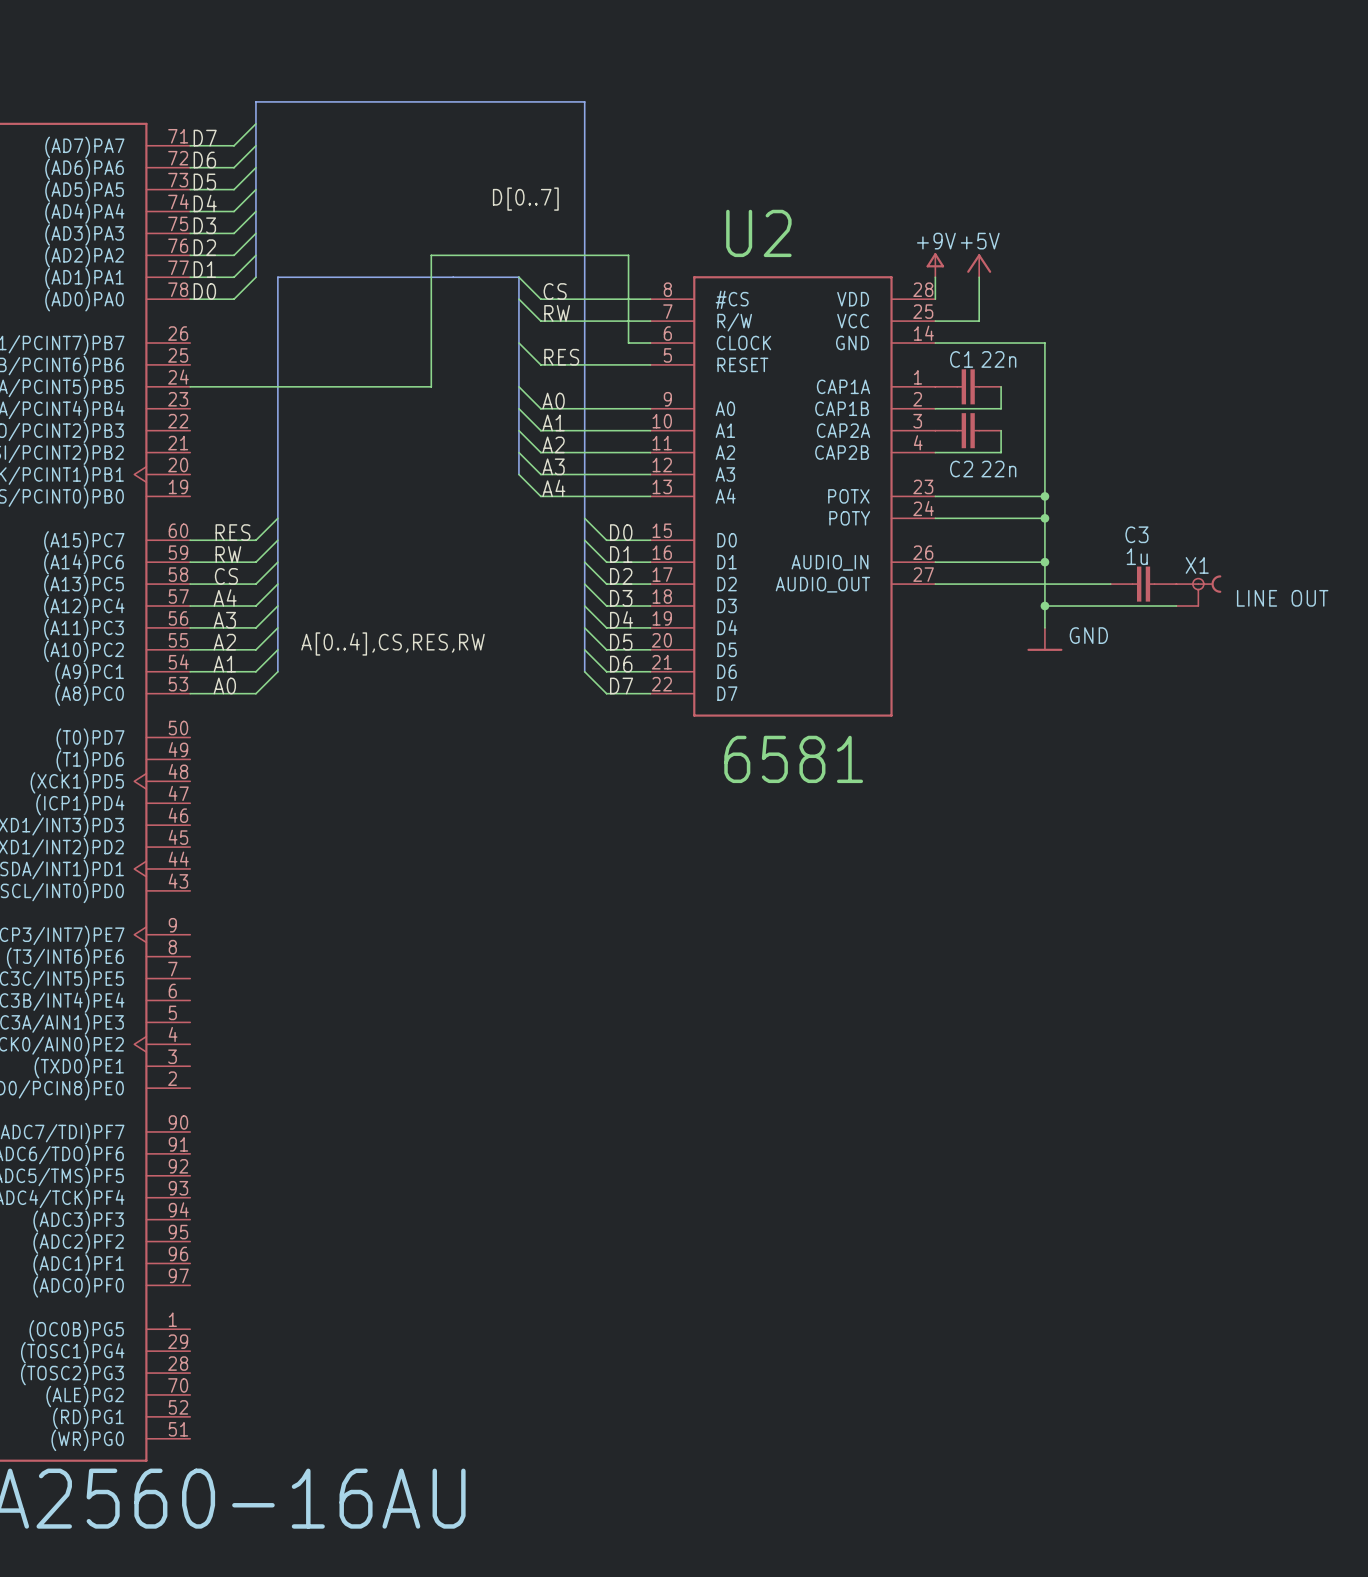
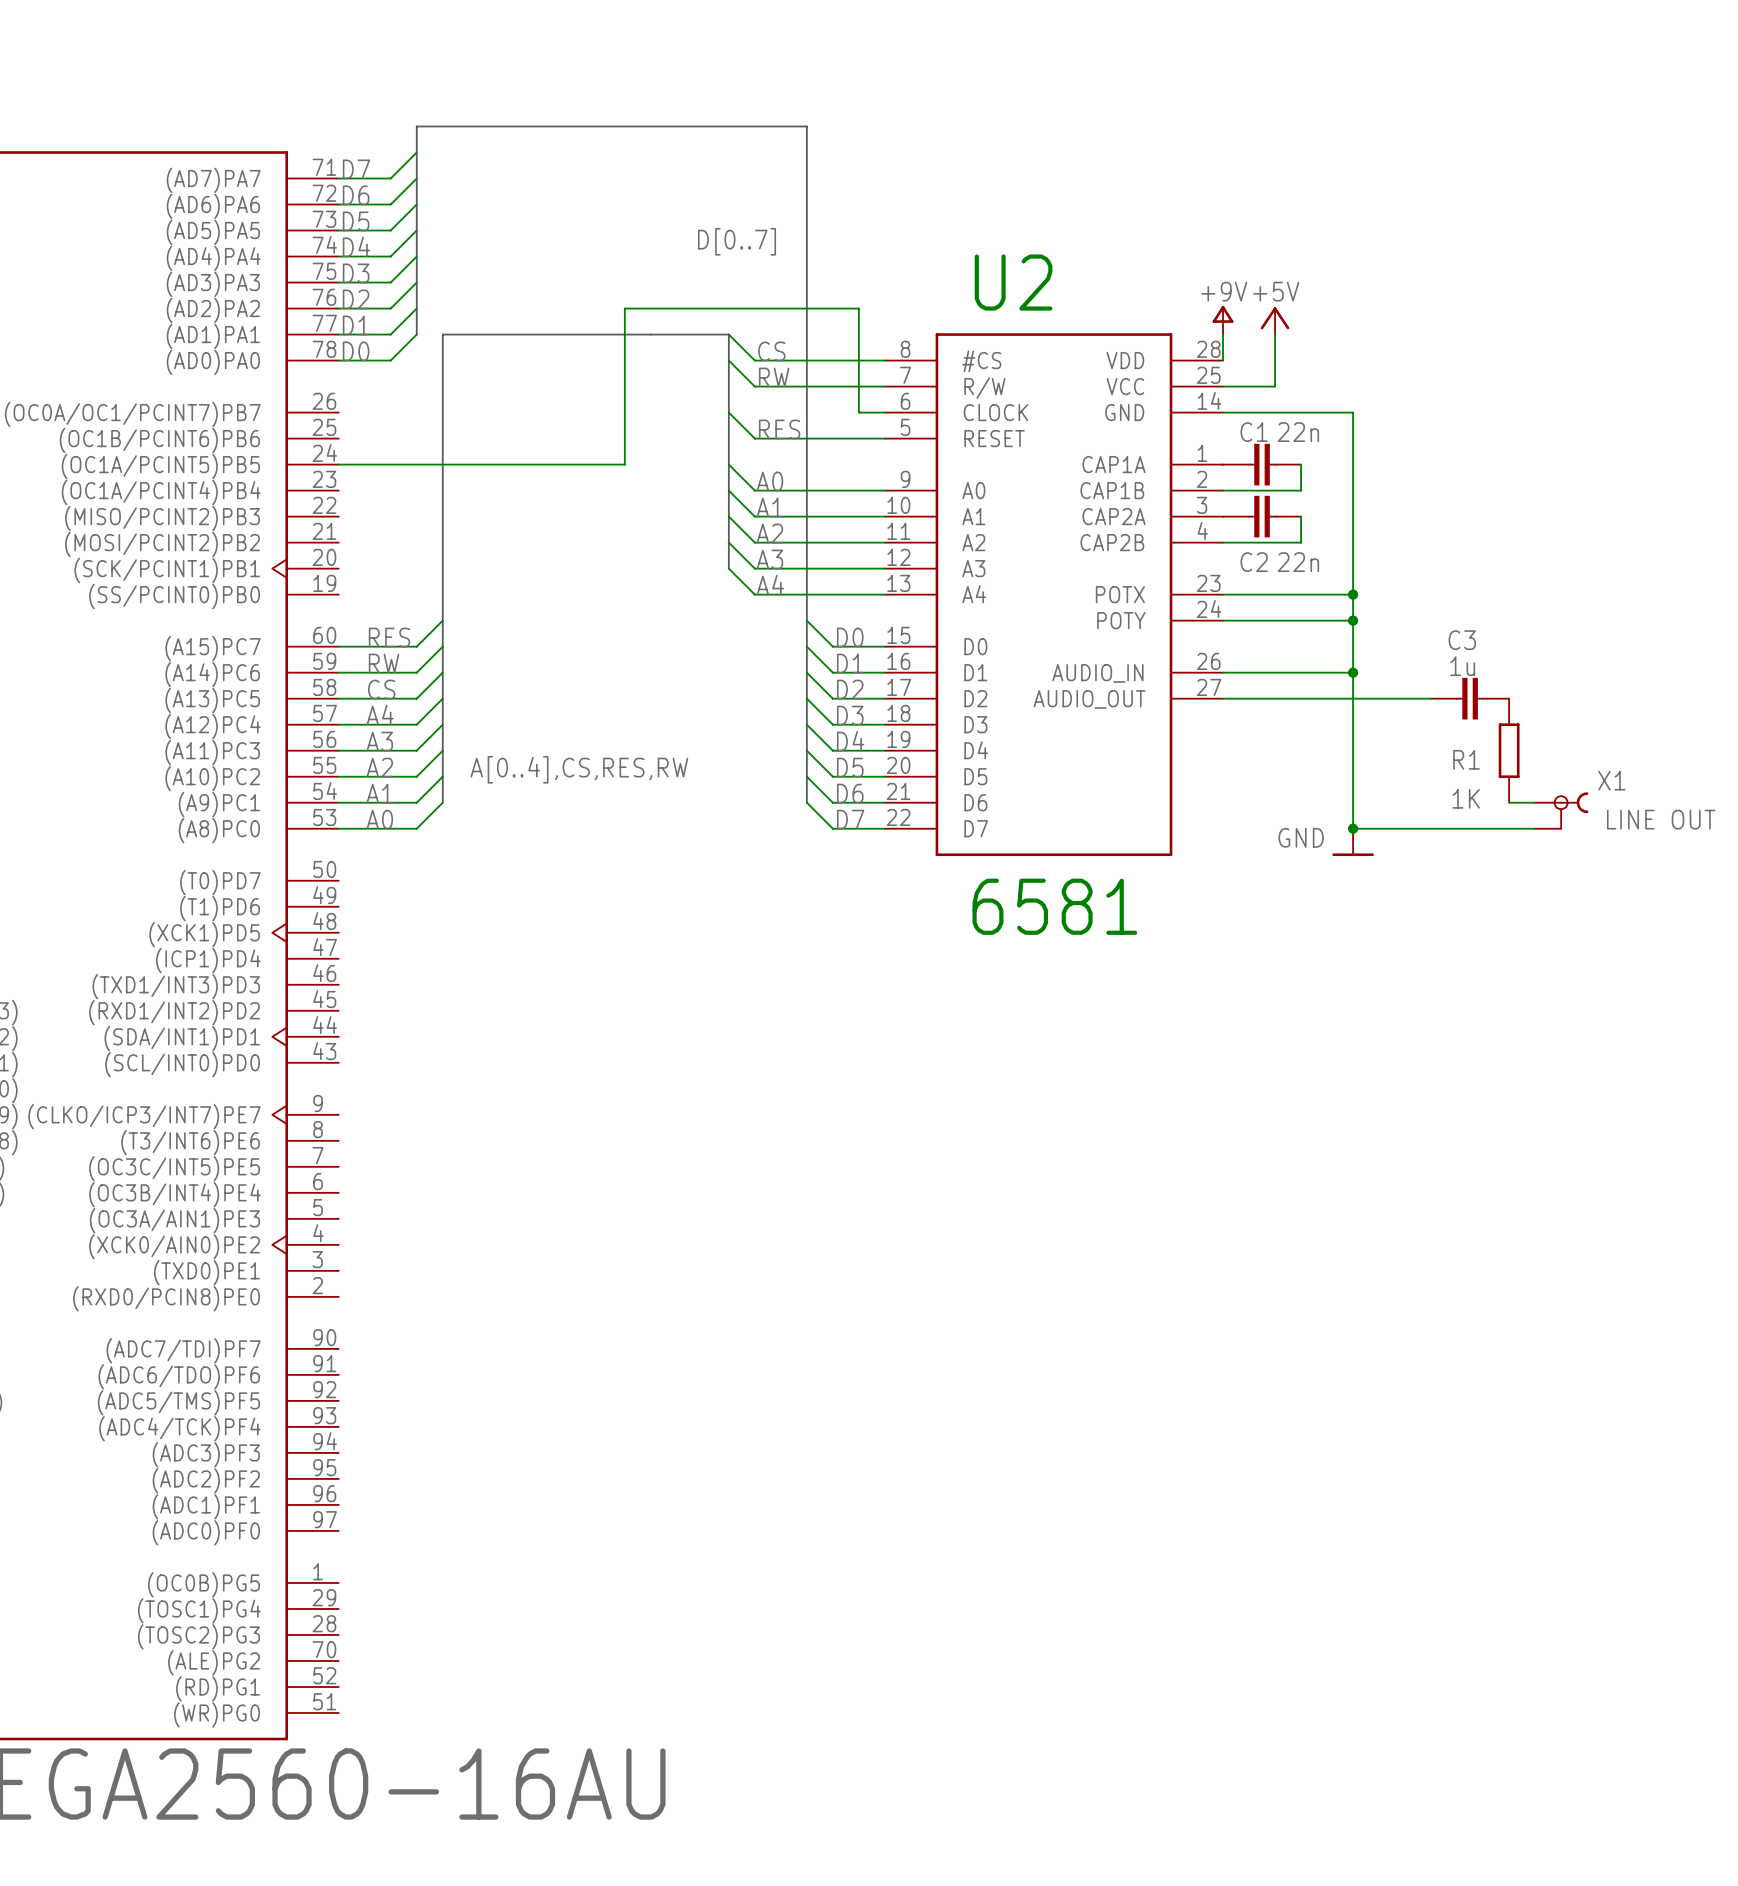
X1 name position: X1 (1197, 565) -> X1 (1611, 780)
X1 position: (1198, 590) -> (1561, 810)
wire: (1044, 606) (1176, 606) -> none
junction: (1044, 606) -> none
wire: none -> (1353, 750) (1353, 828) (1535, 828)
R1: none -> 1K (1509, 750)
power symbol text position: GND (1088, 635) -> GND (1301, 837)
power symbol position: GND (1044, 639) -> GND (1353, 842)
wire: none -> (1509, 802) (1535, 802)
junction: none -> (1353, 828)

